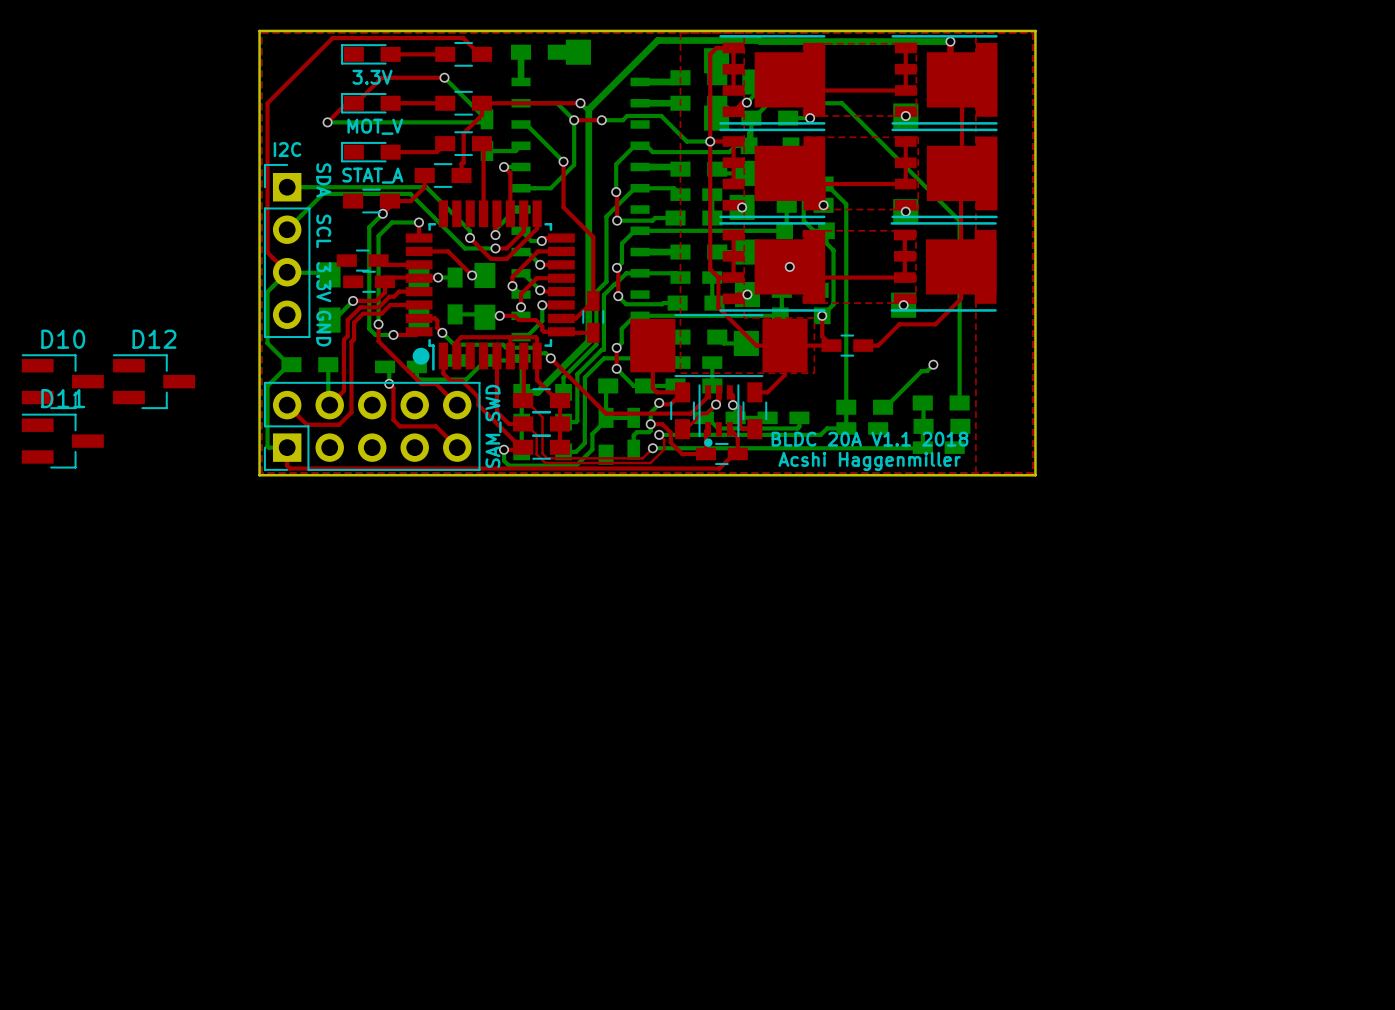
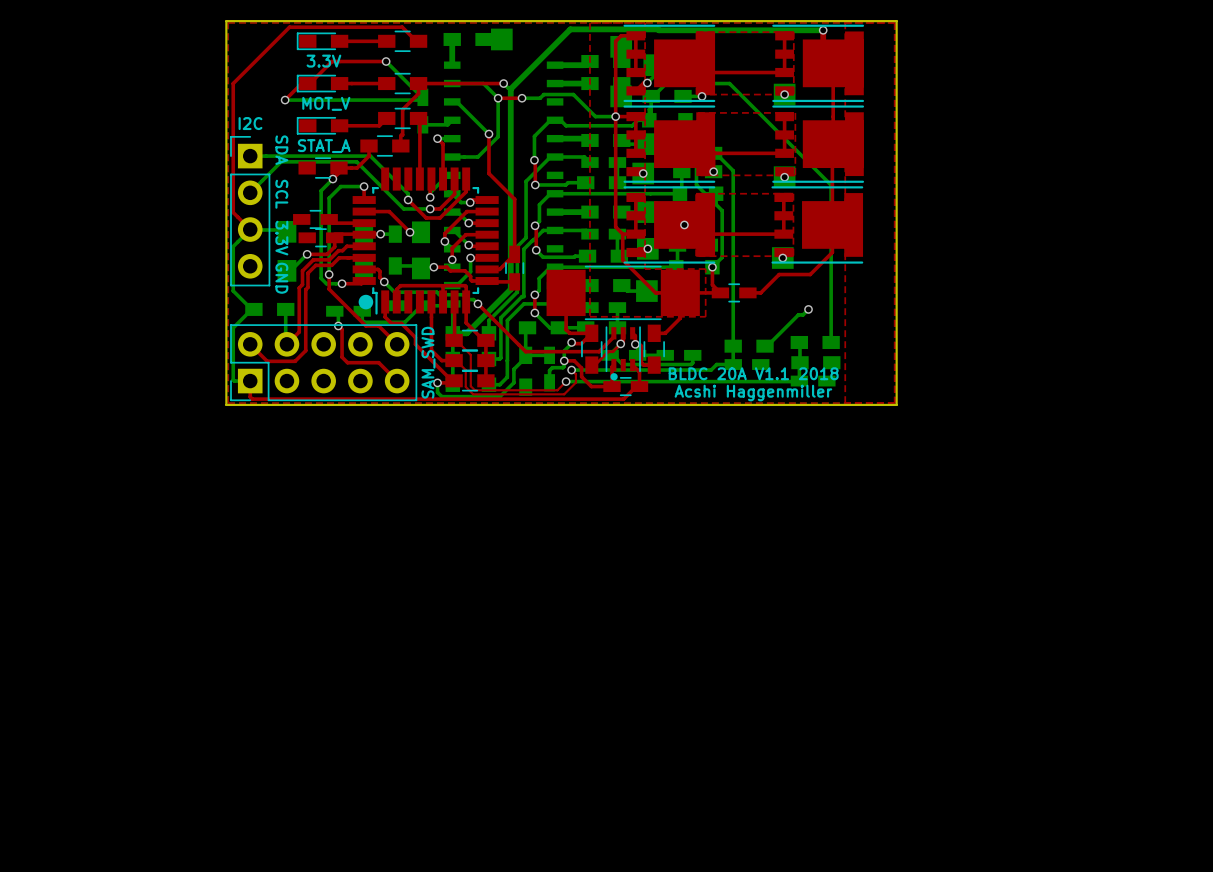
D10: (62, 381) -> none
D12: (153, 381) -> none
D11: (62, 441) -> none

